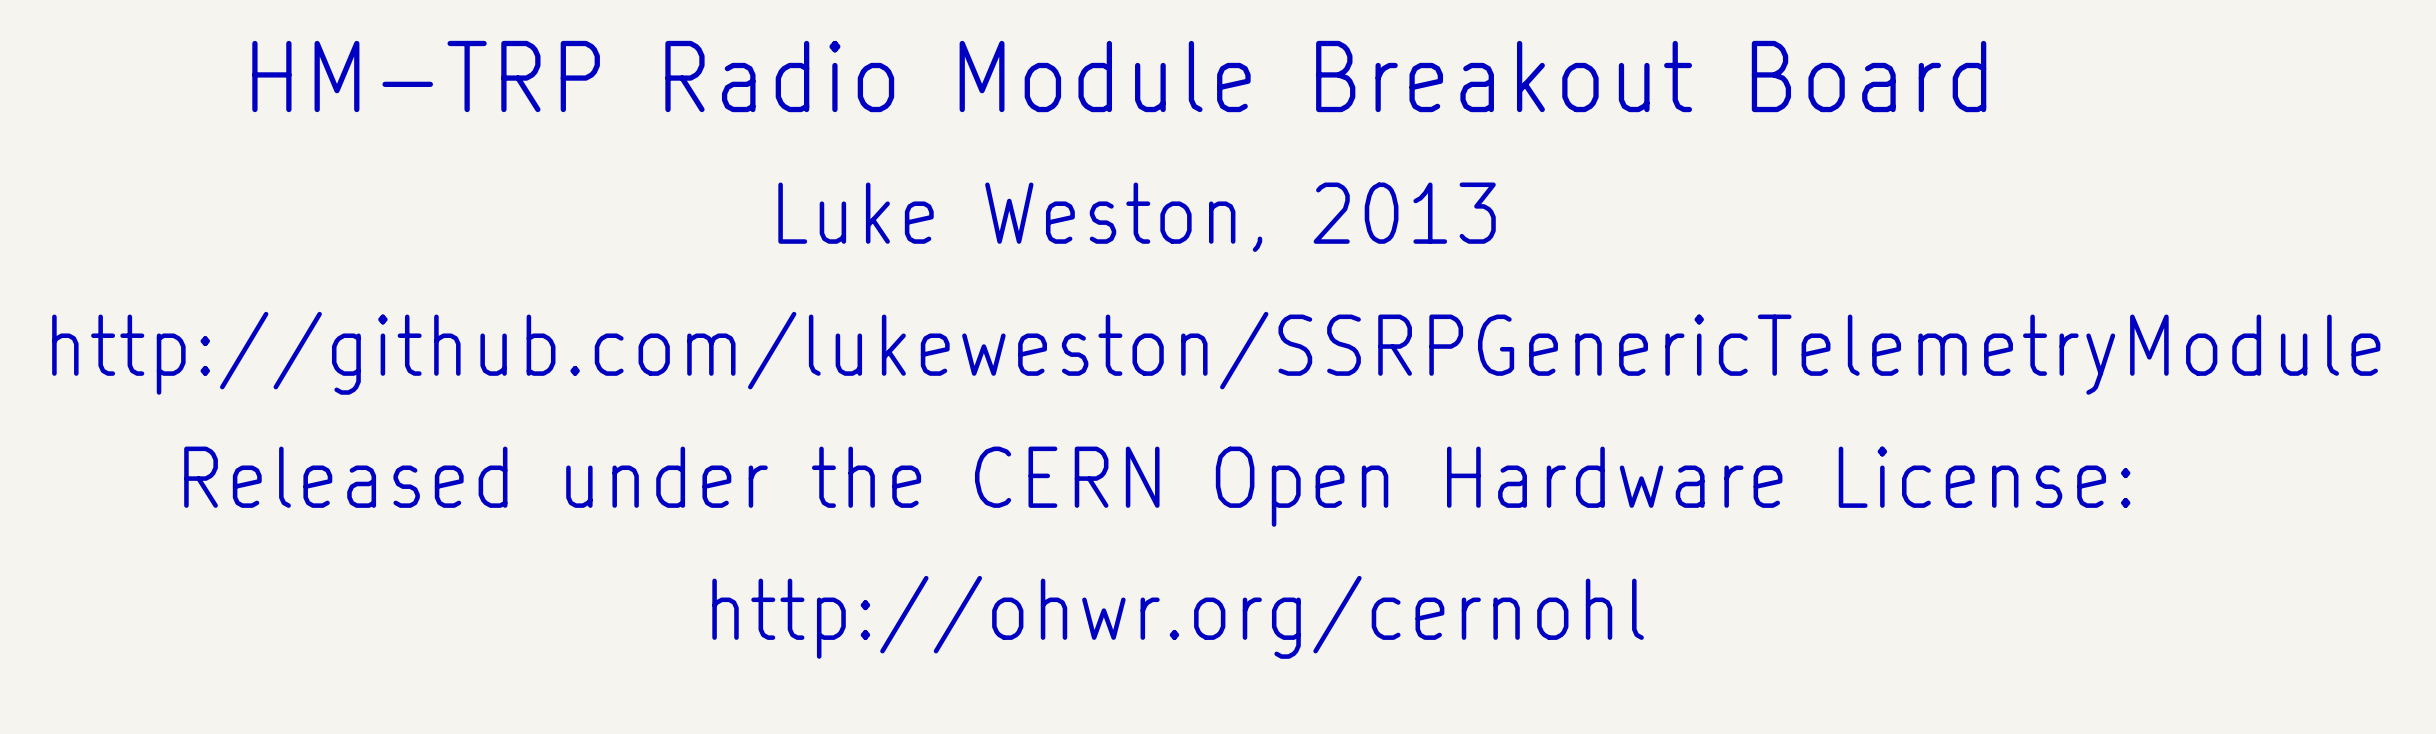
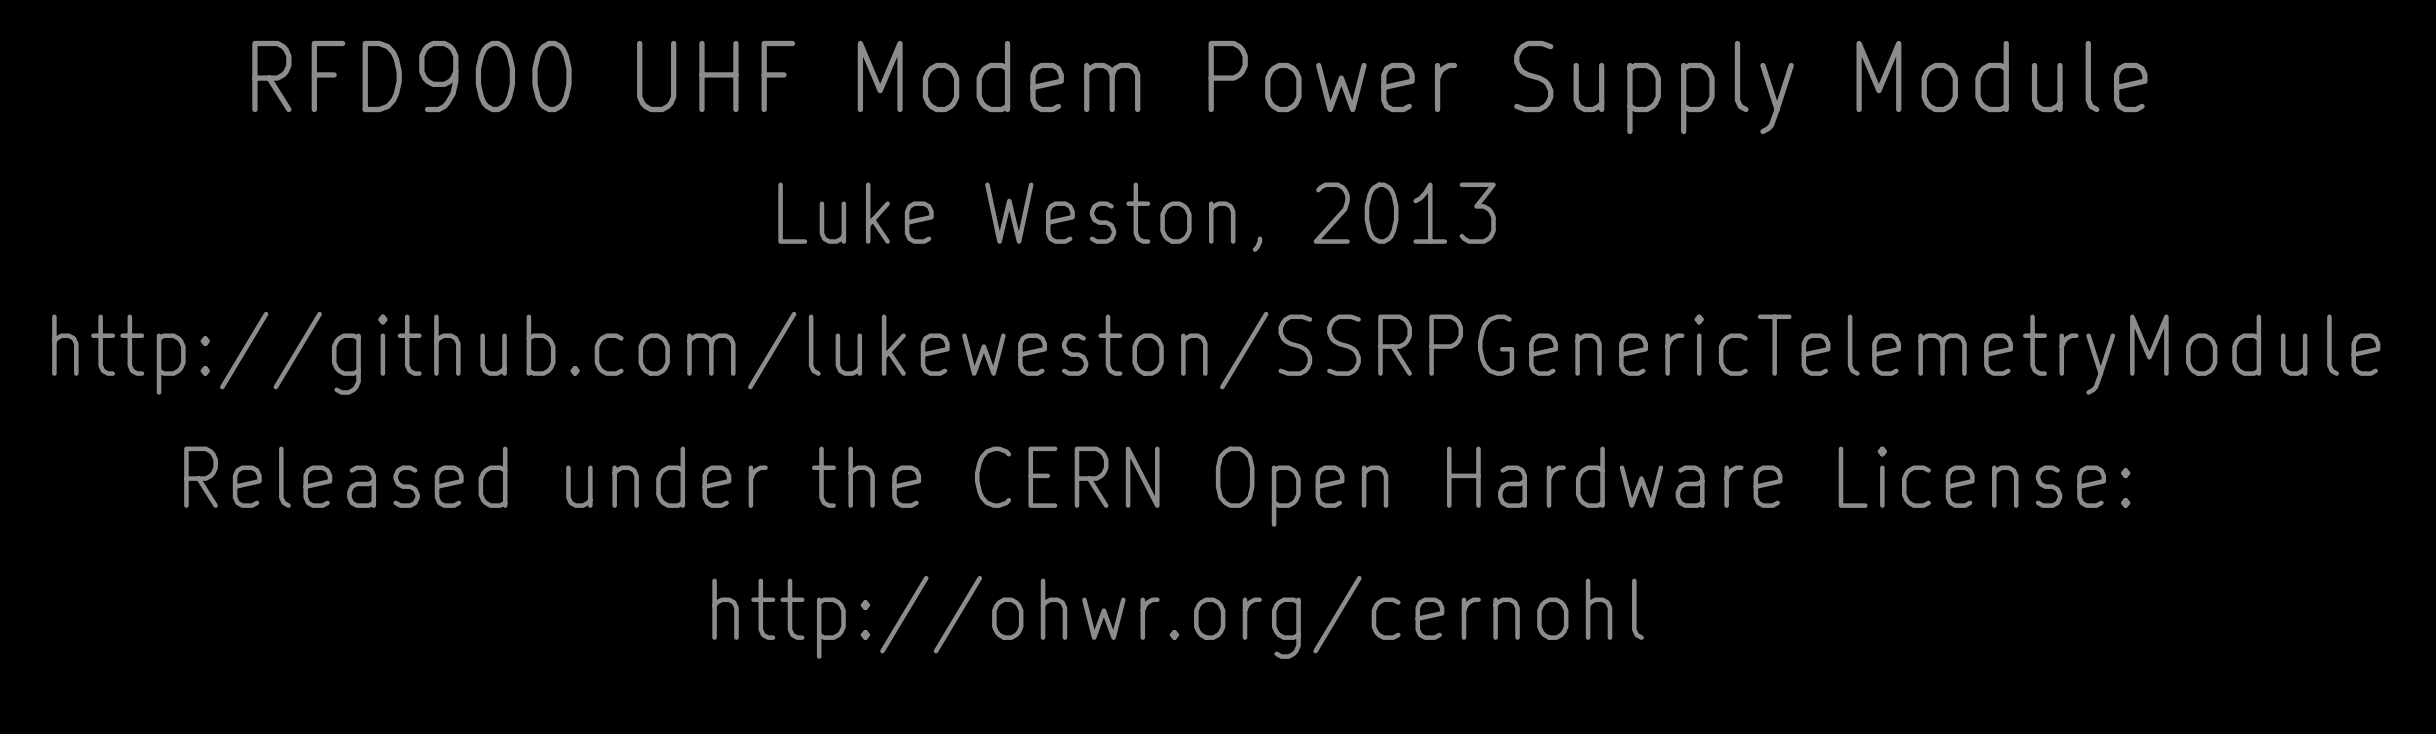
text: HM-TRP Radio Module Breakout Board (1119, 76) -> RFD900 UHF Modem Power Supply Module (1199, 87)

